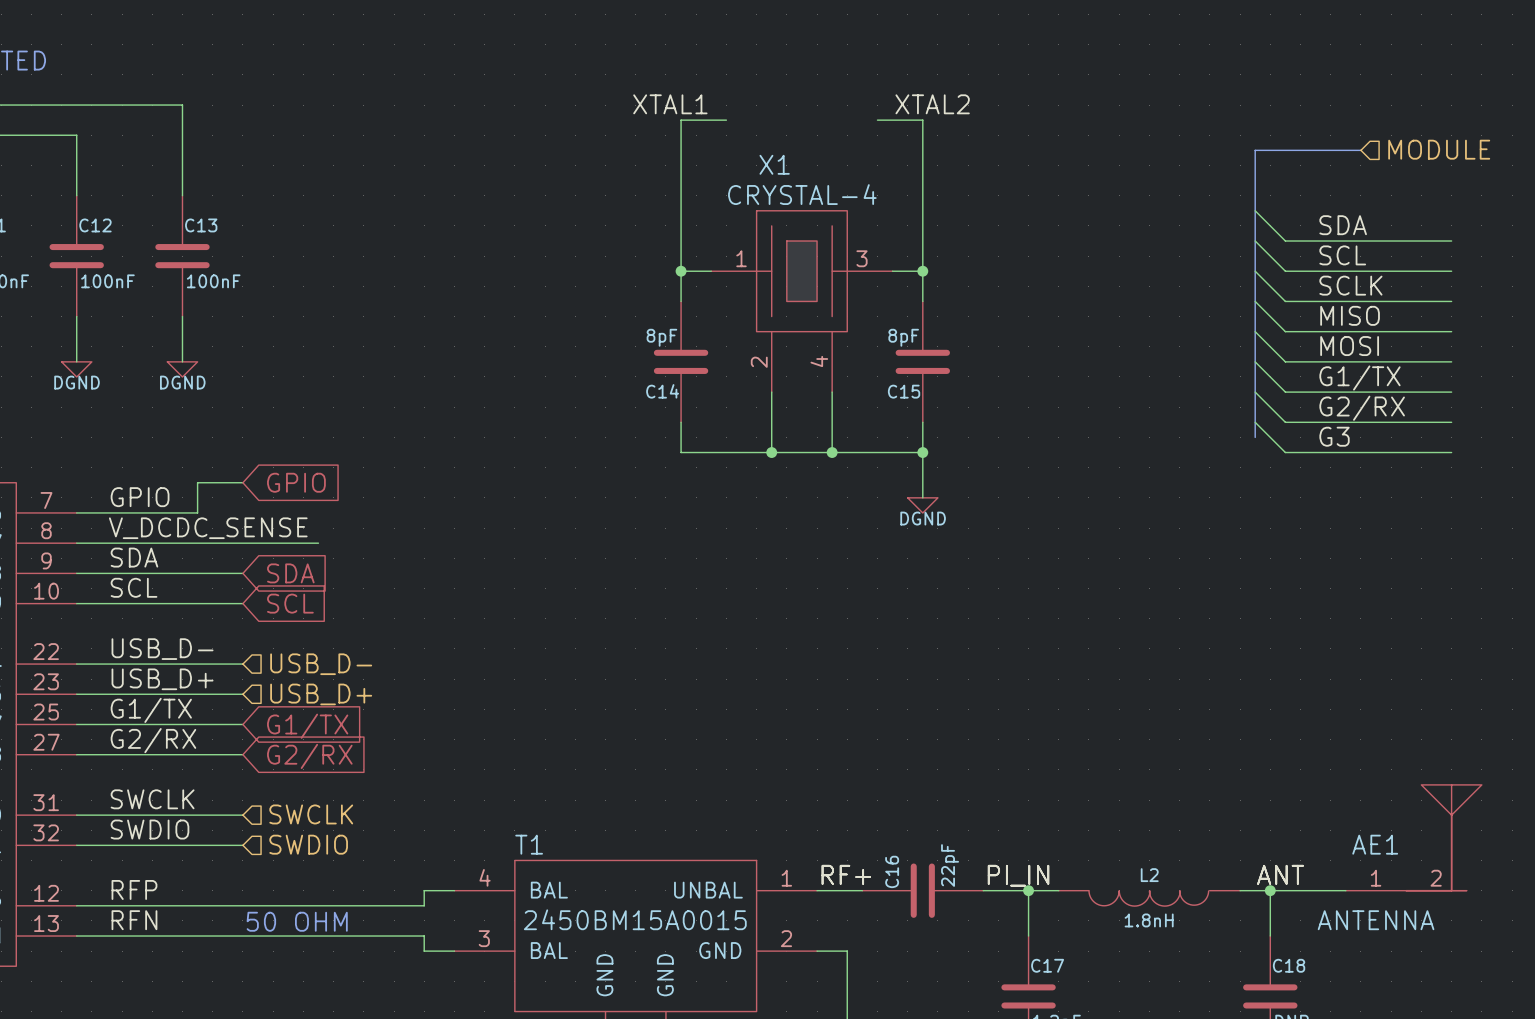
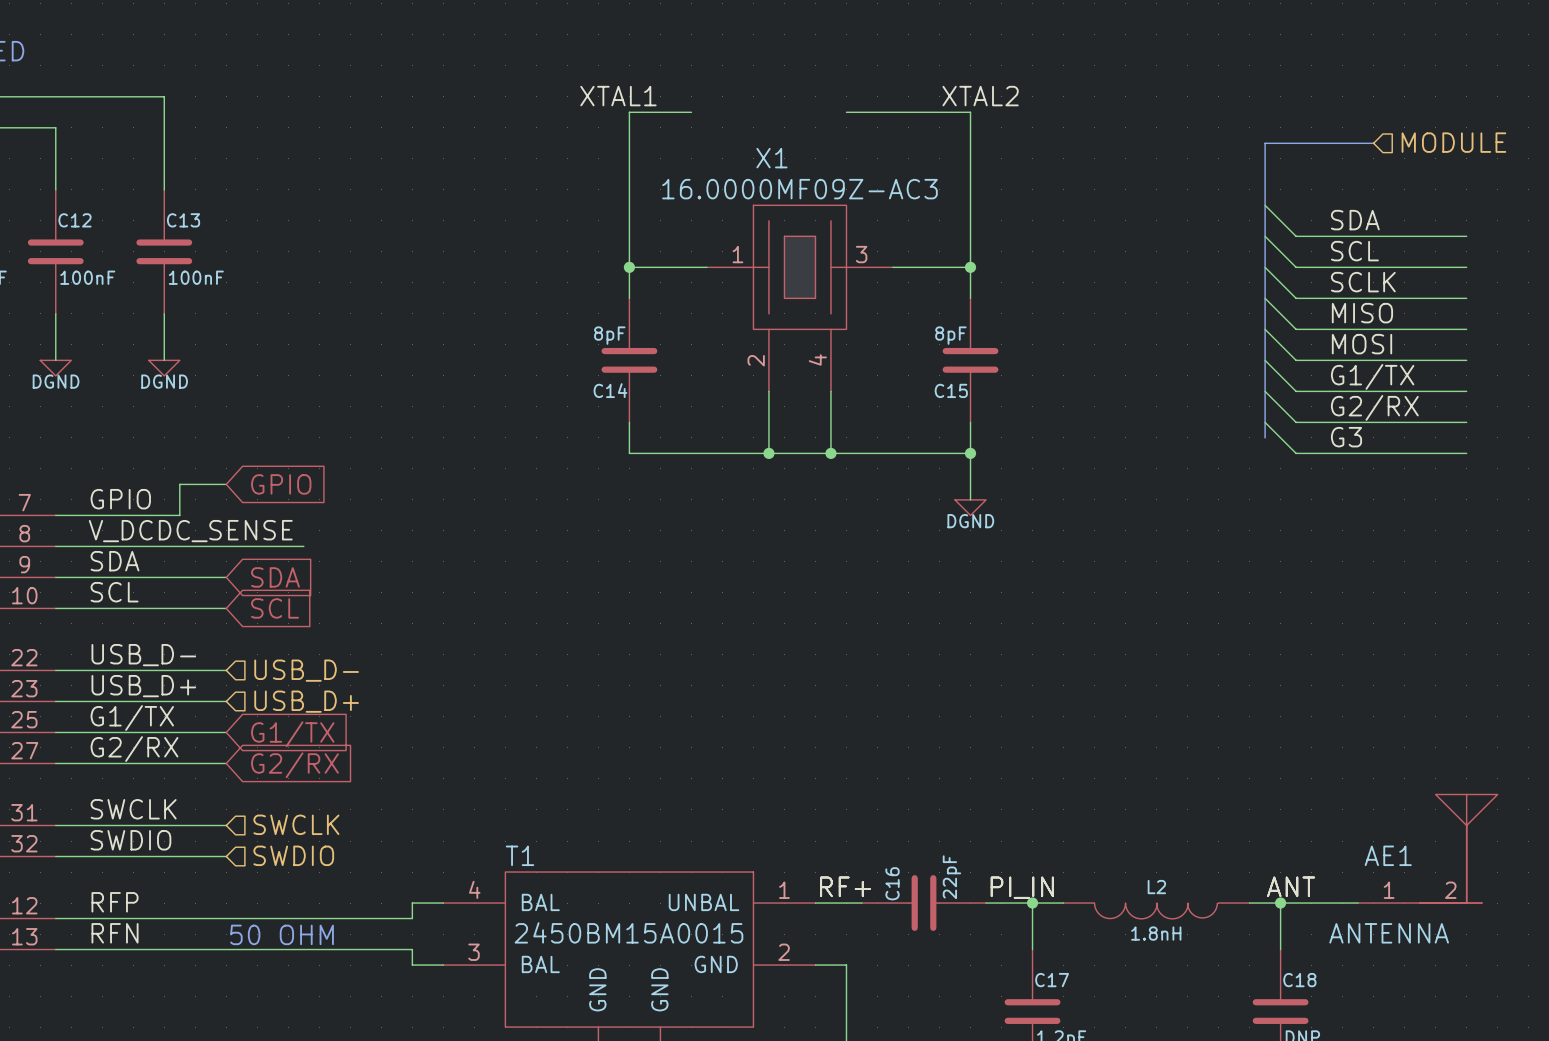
label position: XTAL1 (670, 104) -> XTAL1 (618, 96)
label position: XTAL2 (932, 104) -> XTAL2 (980, 96)
wire: (681, 120) (681, 301) -> (675, 112) (629, 112) (629, 298)
wire: (696, 120) (726, 120) -> (846, 112) (877, 112)
wire: (922, 120) (922, 301) -> (924, 112) (970, 112) (970, 298)
X1 value: CRYSTAL-4 (802, 194) -> 16.0000MF09Z-AC3 (799, 189)
wire: none -> (629, 267) (675, 267)
junction position: (681, 271) -> (629, 267)
wire: none -> (924, 267) (970, 267)
junction position: (922, 271) -> (970, 267)
C14 position: (681, 361) -> (629, 360)
C15 position: (922, 361) -> (970, 360)
wire: (681, 422) (681, 452) -> (629, 422) (629, 453) (675, 453)
wire: (922, 422) (922, 497) -> (970, 422) (970, 499)
wire: none -> (924, 453) (970, 453)
junction position: (922, 452) -> (970, 453)
power symbol position: DGND (922, 505) -> DGND (970, 507)

